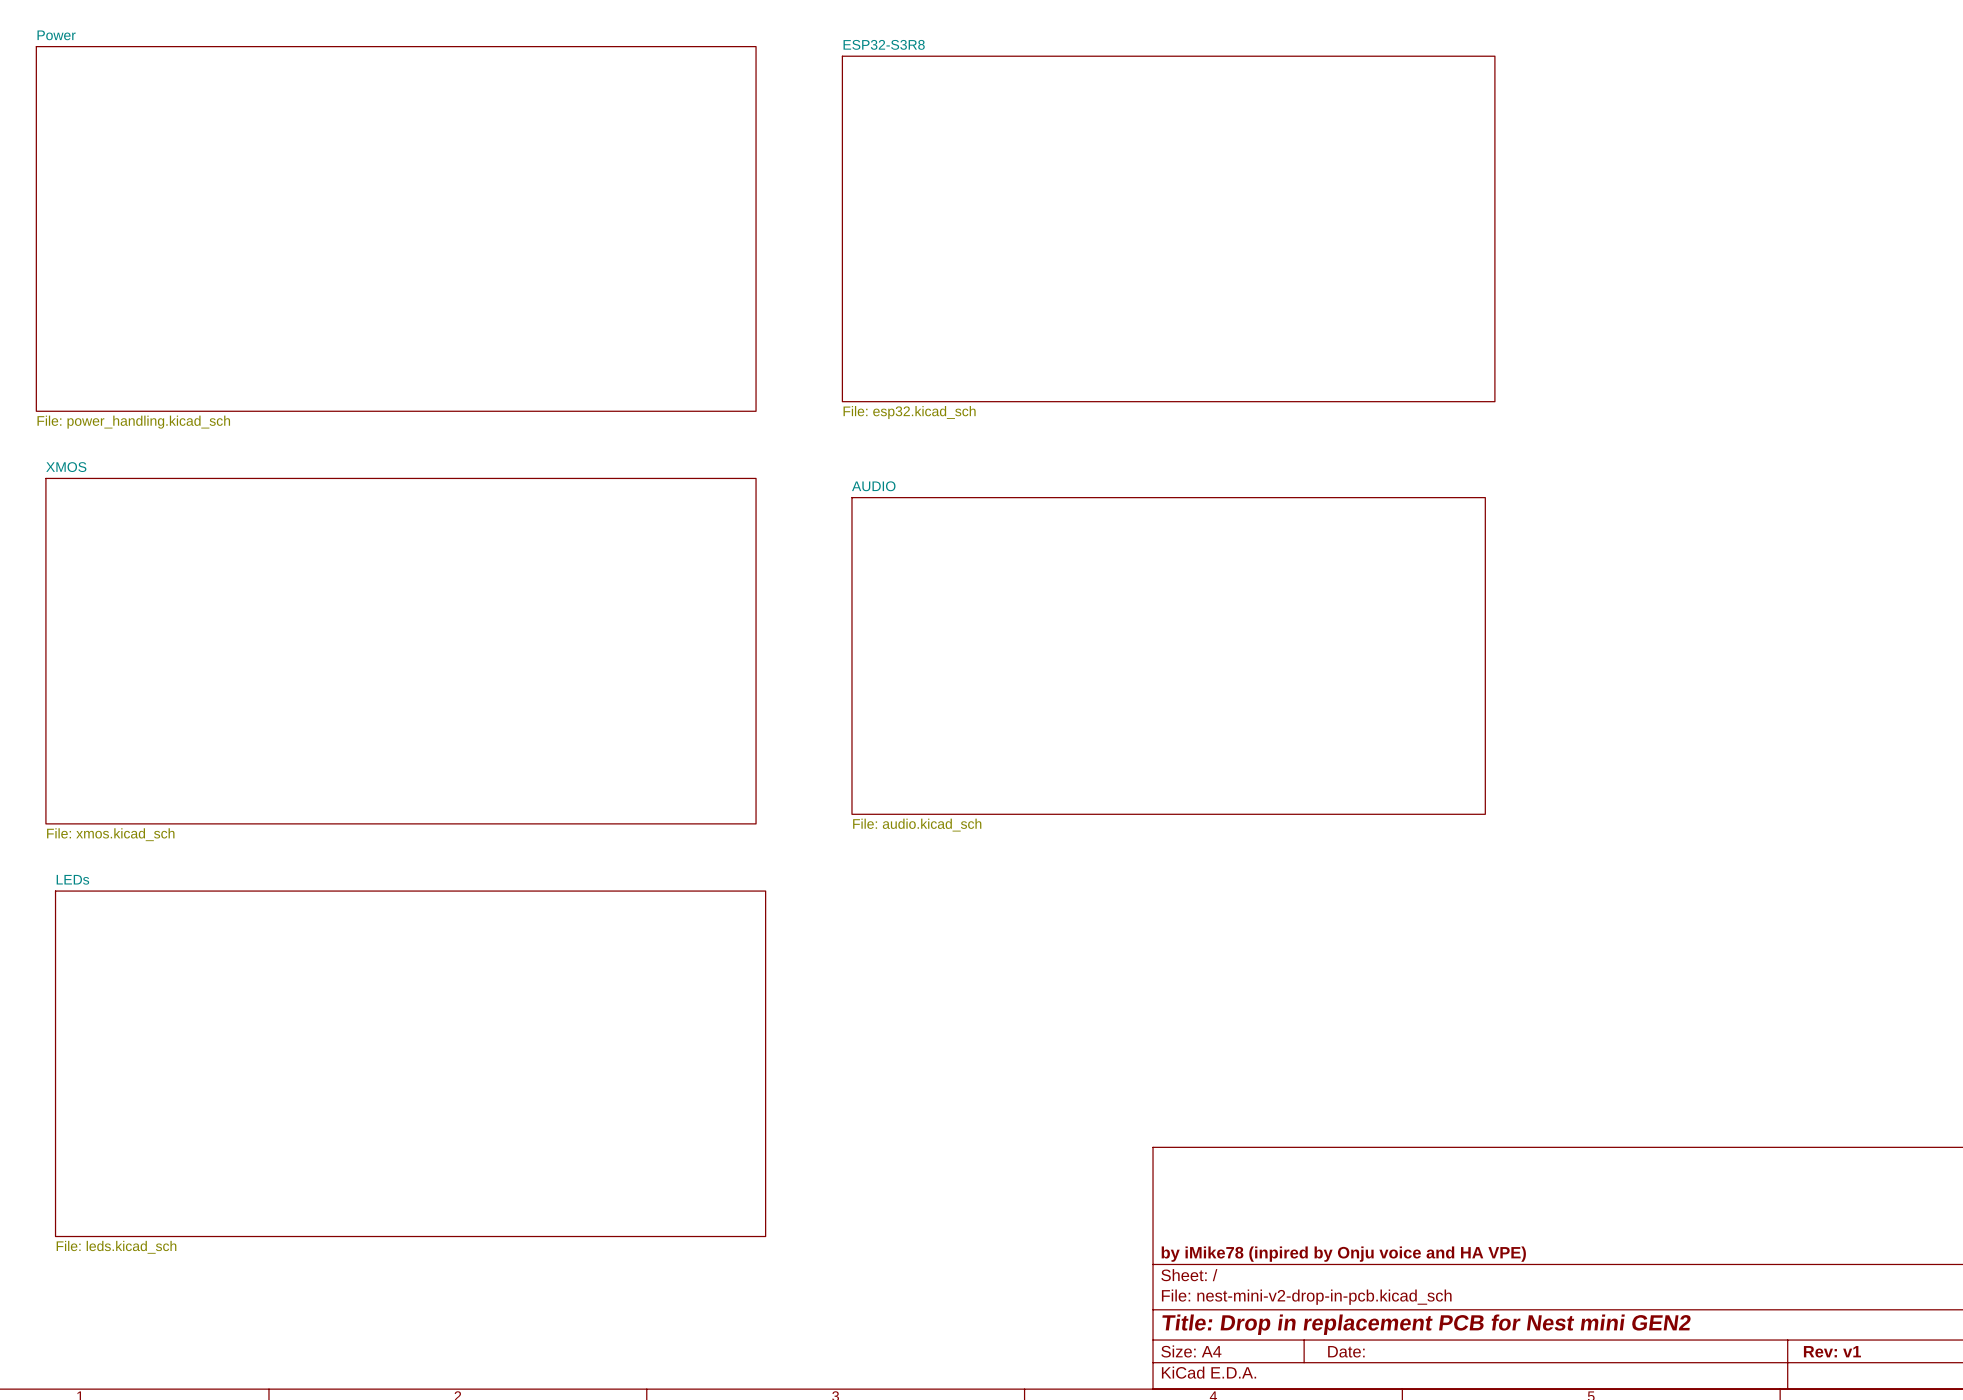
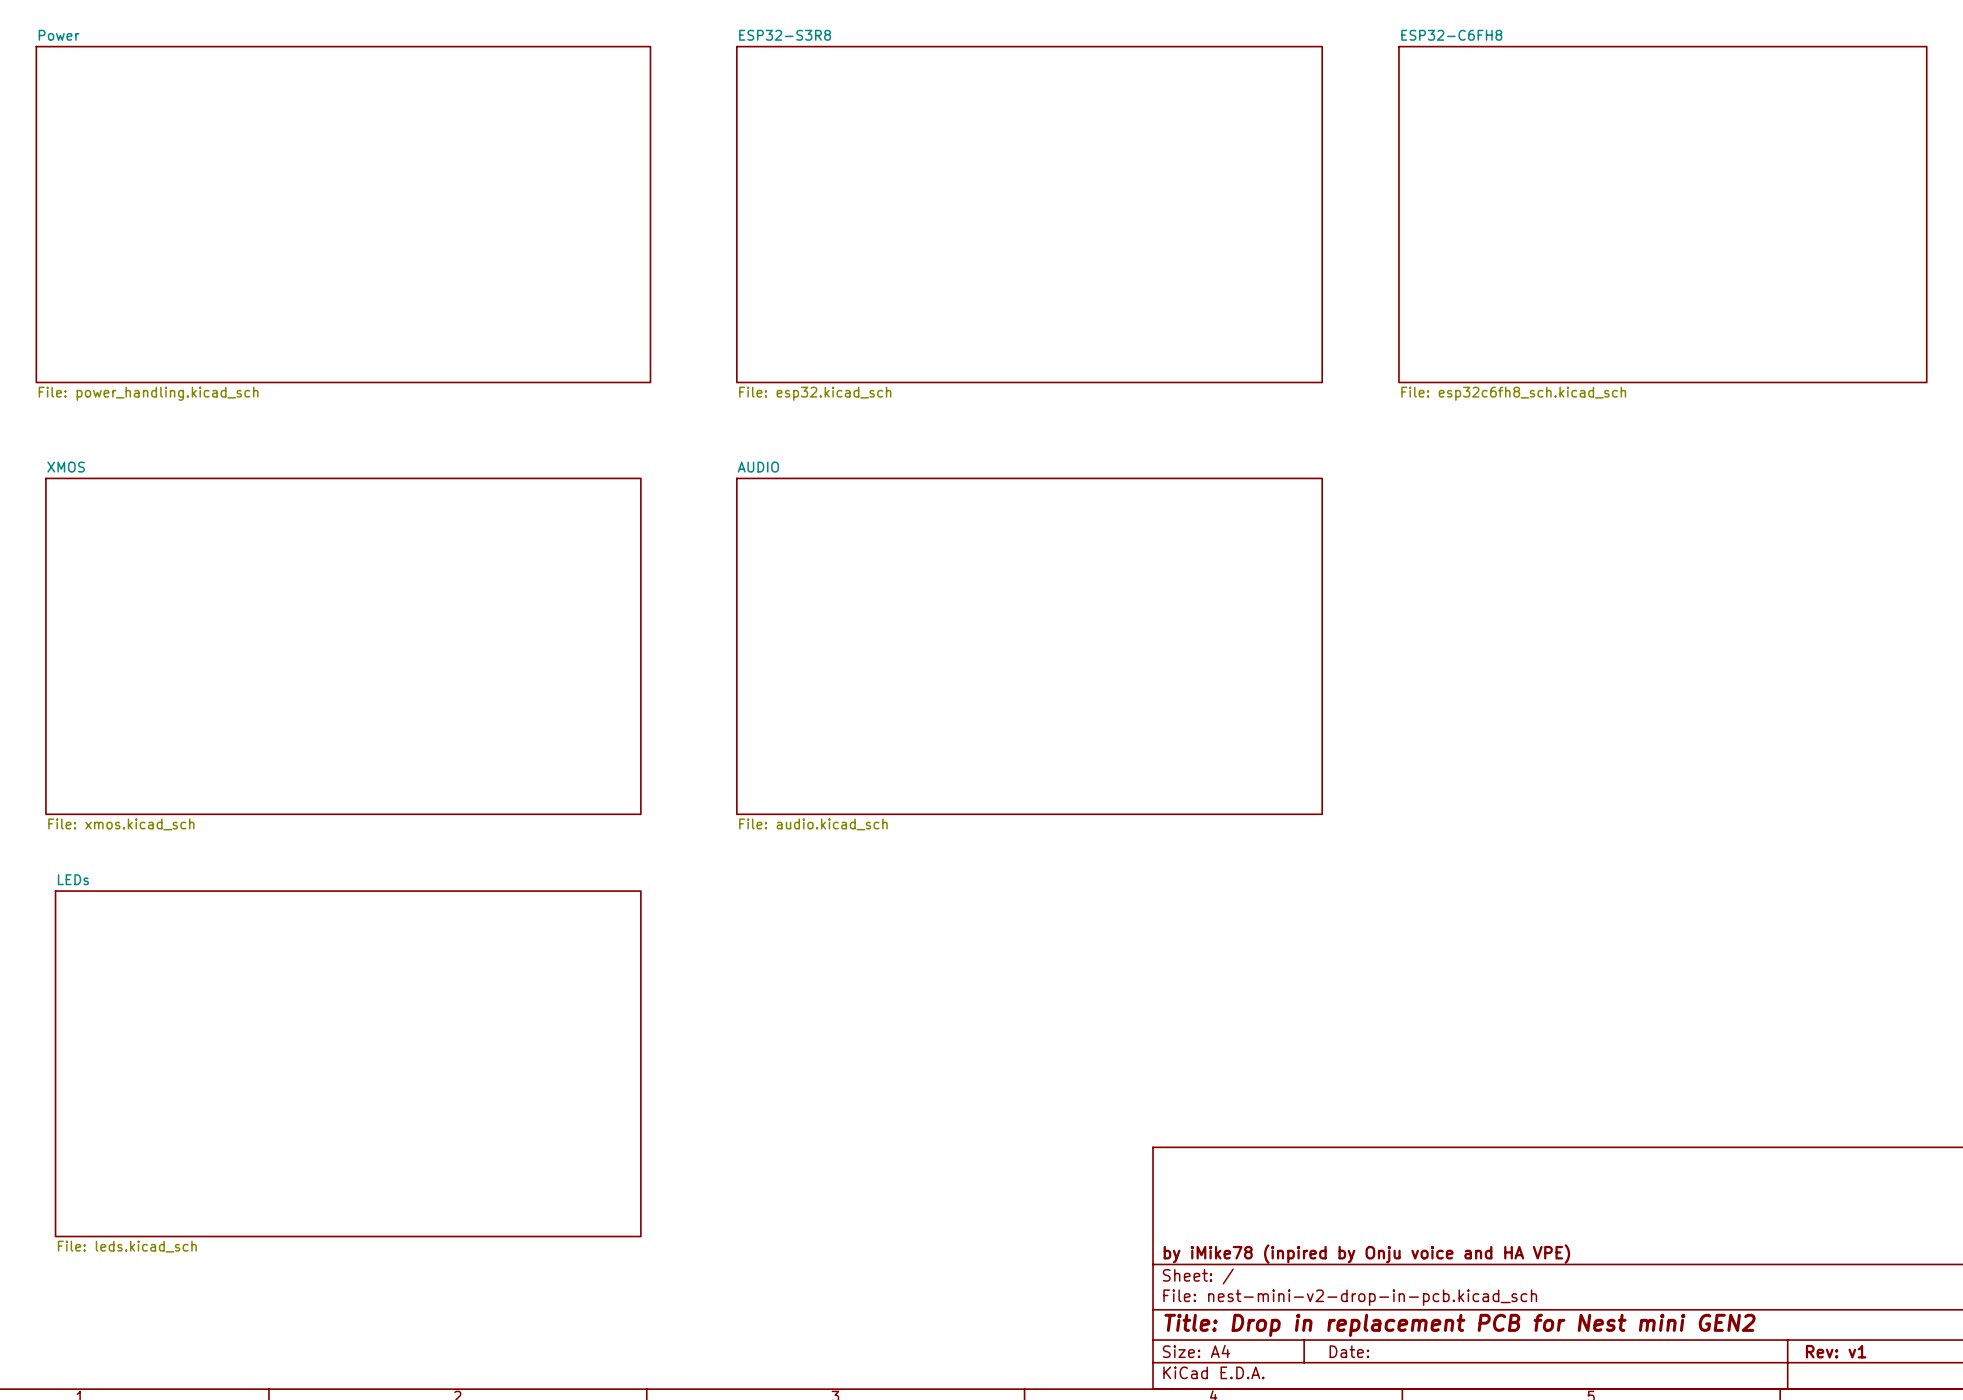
sheet ESP32-S3R8 name position: ESP32-S3R8 (884, 44) -> ESP32-S3R8 (785, 35)
sheet ESP32-S3R8 shape: [841, 55, 1496, 403] -> [736, 46, 1323, 384]
sheet Power: none -> File: power_handling.kicad_sch (343, 214)
sheet ESP32-C6FH8: none -> File: esp32c6fh8_sch.kicad_sch (1662, 214)
sheet Power: File: power_handling.kicad_sch (396, 228) -> none
sheet ESP32-S3R8 value position: File: esp32.kicad_sch (909, 412) -> File: esp32.kicad_sch (815, 393)
sheet XMOS: none -> File: xmos.kicad_sch (343, 646)
sheet AUDIO: none -> File: audio.kicad_sch (1029, 646)
sheet XMOS: File: xmos.kicad_sch (400, 651) -> none
sheet AUDIO: File: audio.kicad_sch (1168, 655) -> none
sheet LEDs: none -> File: leds.kicad_sch (348, 1063)
sheet LEDs: File: leds.kicad_sch (410, 1063) -> none

